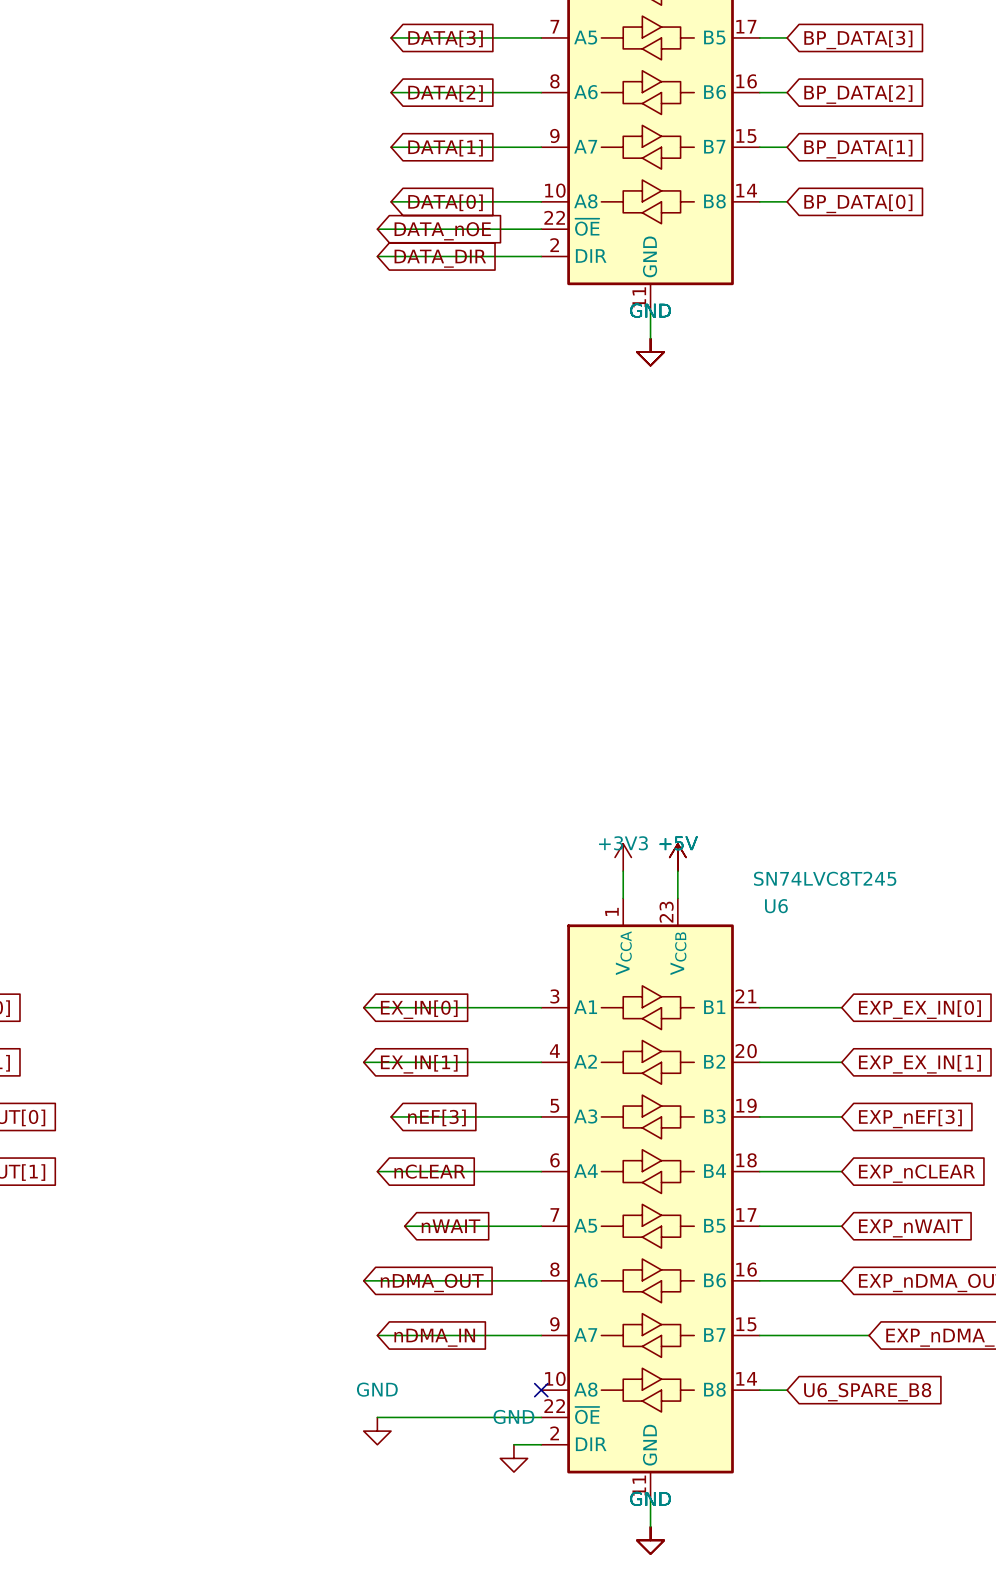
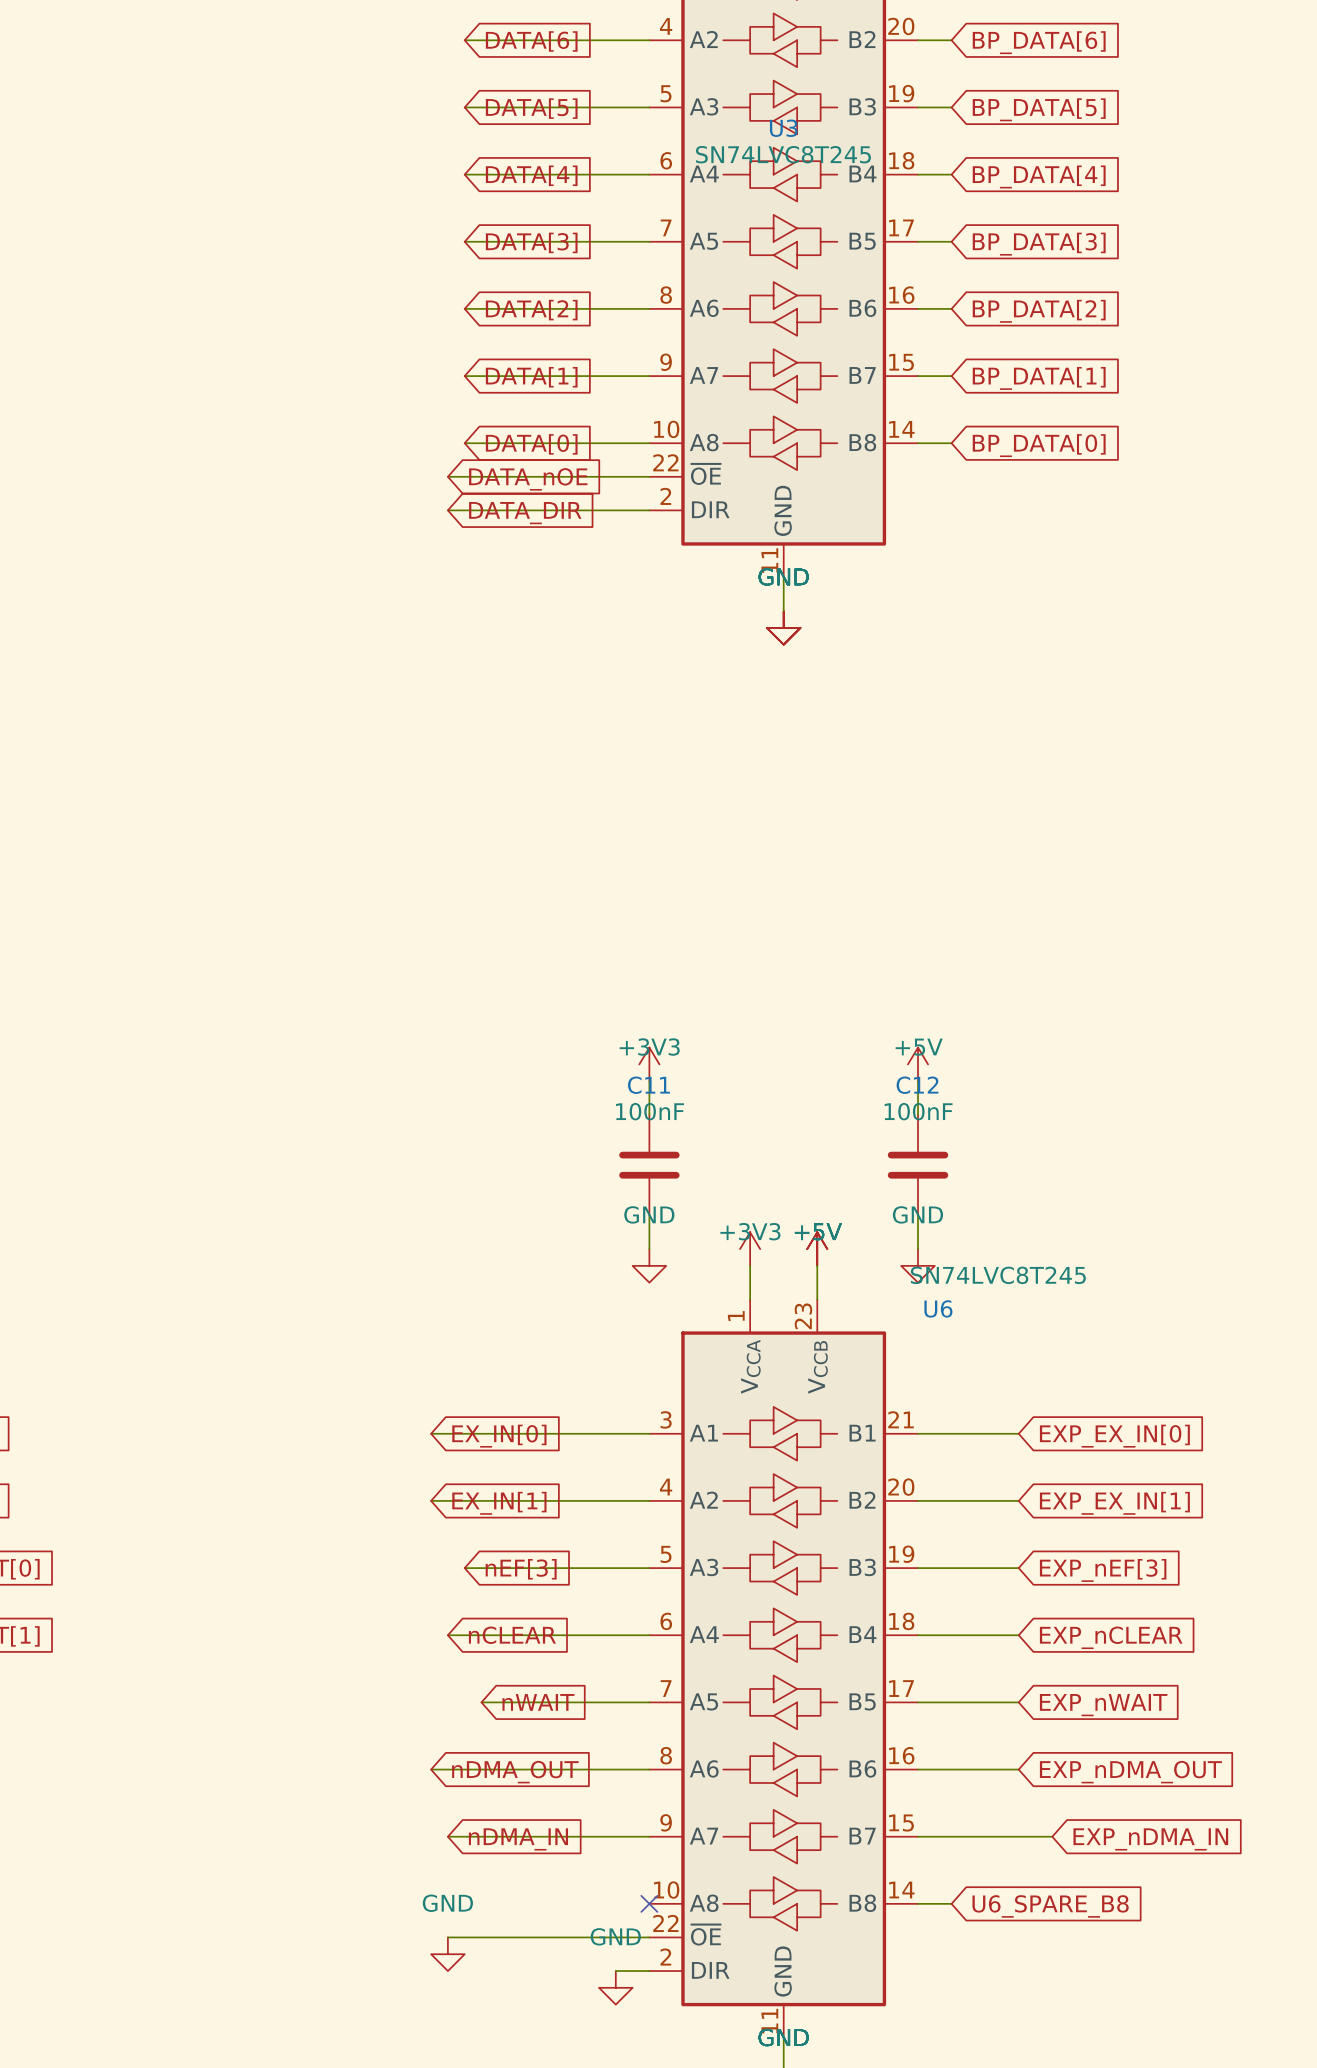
power symbol: none -> +3V3 (649, 1064)
power symbol: none -> +5V (918, 1064)
wire: none -> (649, 1081) (649, 1114)
wire: none -> (918, 1081) (918, 1114)
C11: none -> 100nF (649, 1165)
C12: none -> 100nF (918, 1165)
wire: none -> (649, 1215) (649, 1249)
wire: none -> (918, 1215) (918, 1249)
power symbol: none -> GND (649, 1265)
power symbol: none -> GND (918, 1265)

